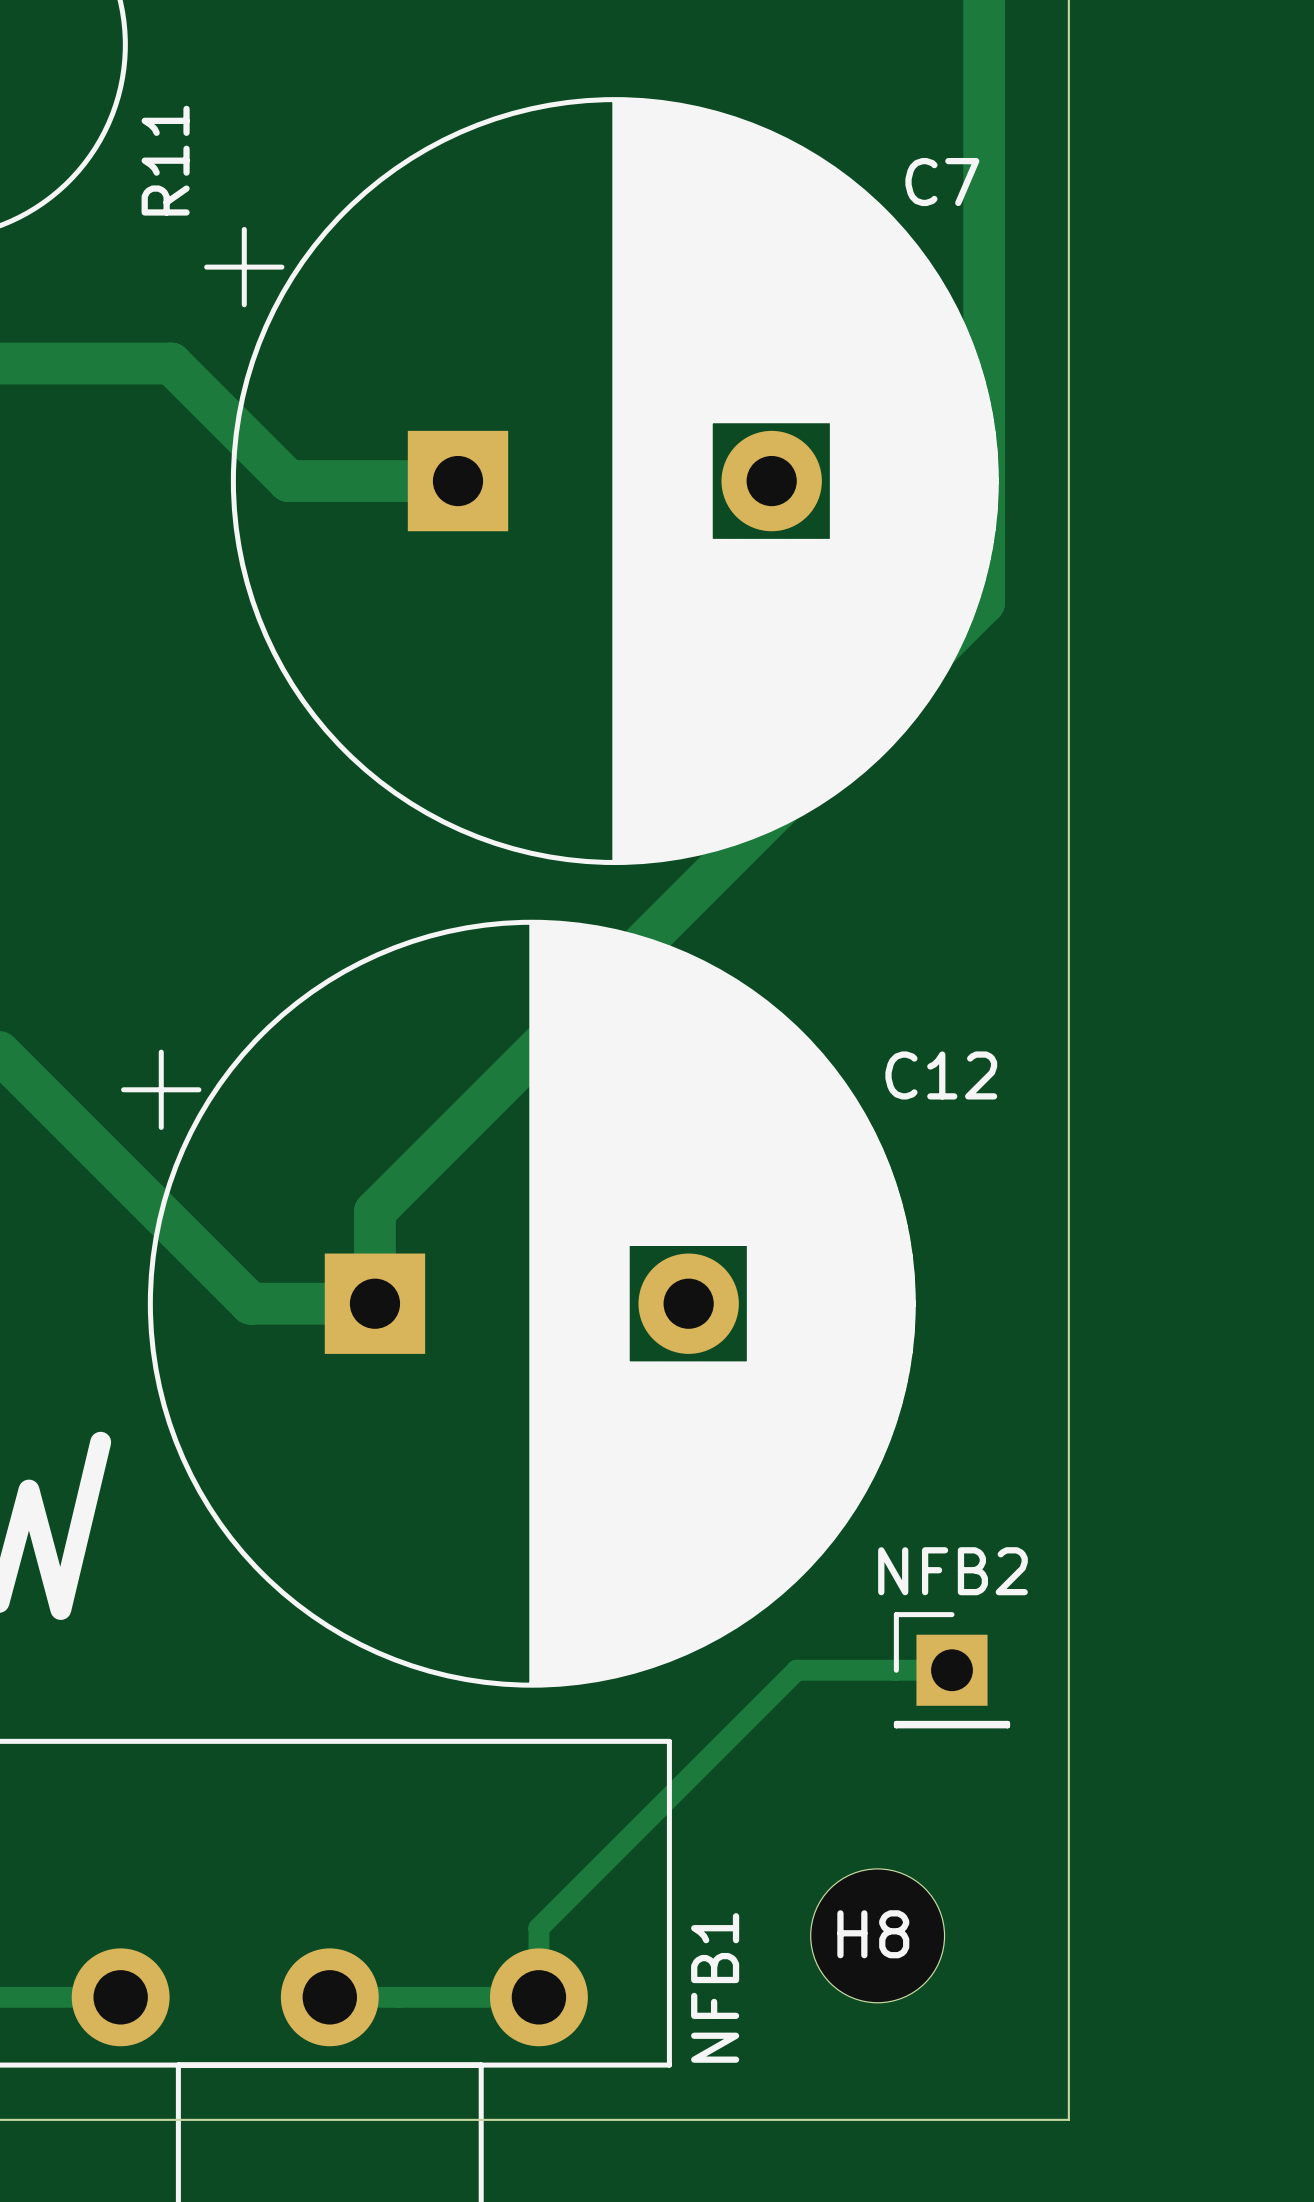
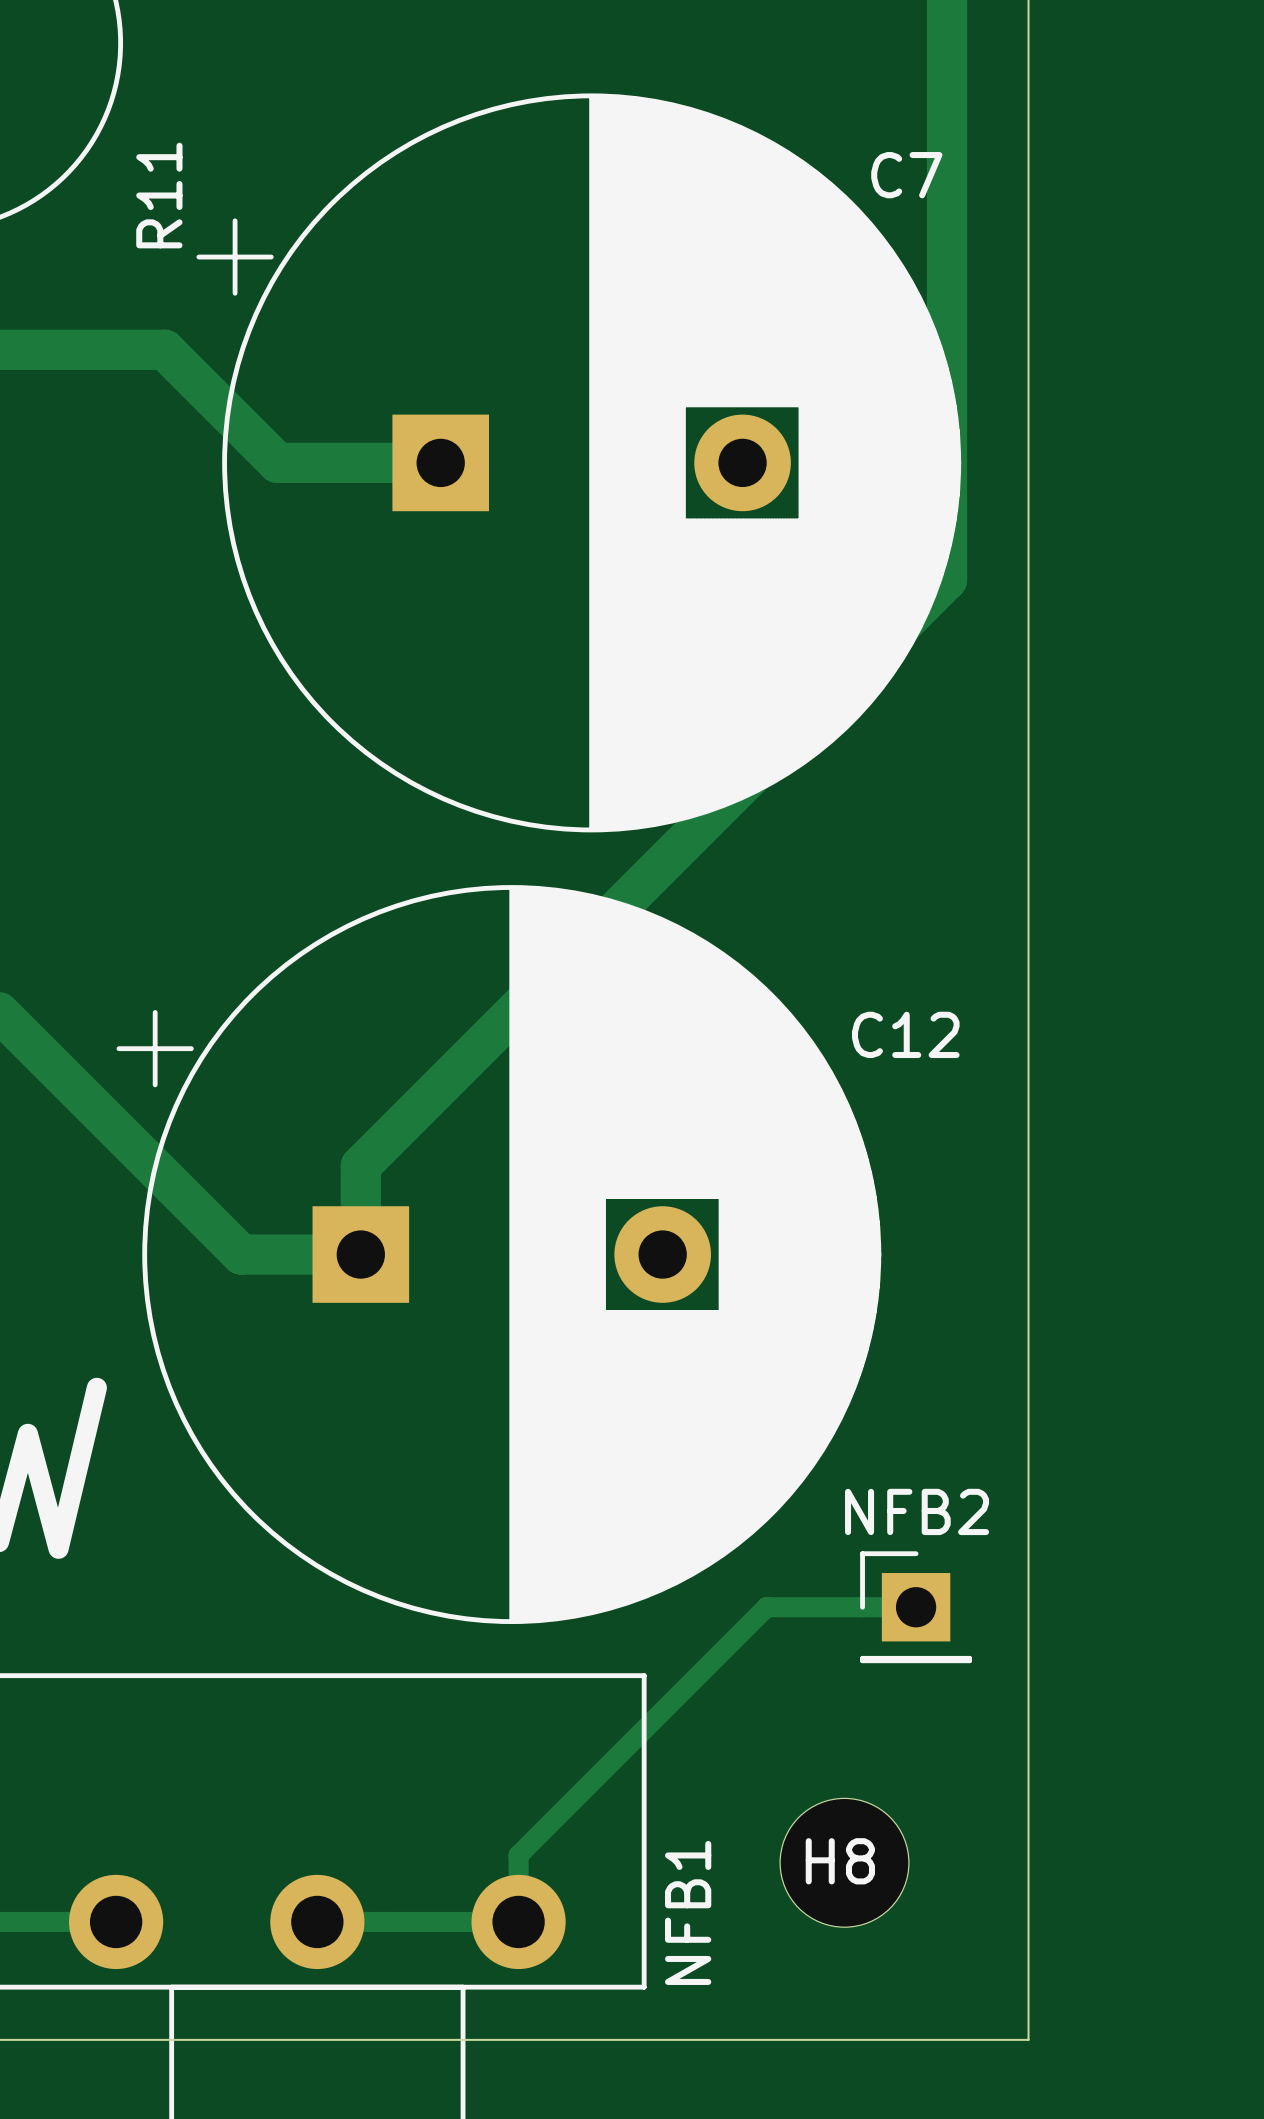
R11 name position: R11 (165, 160) -> R11 (159, 195)

